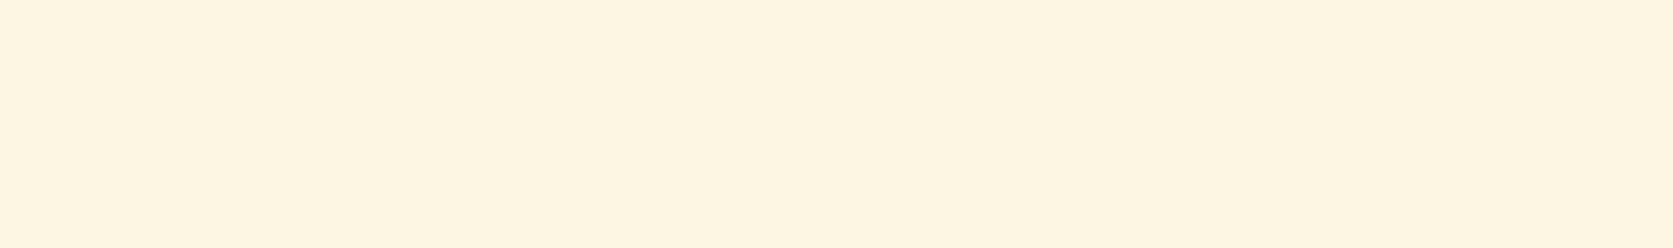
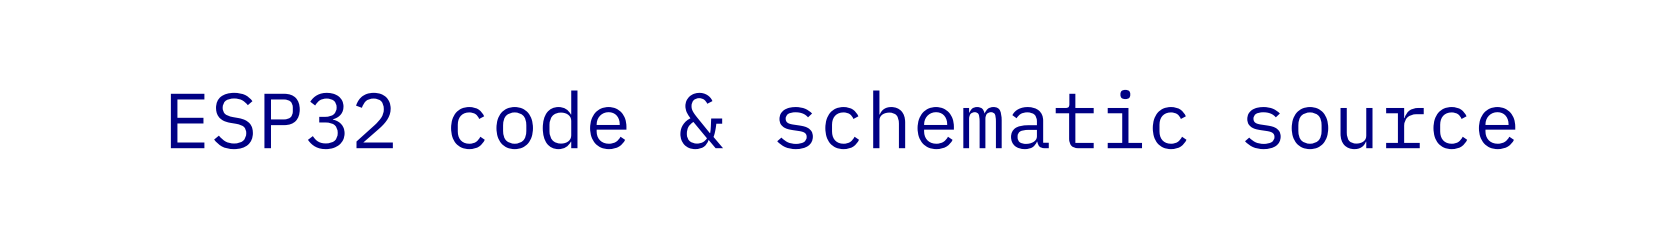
text: none -> ESP32 code & schematic source (843, 119)

